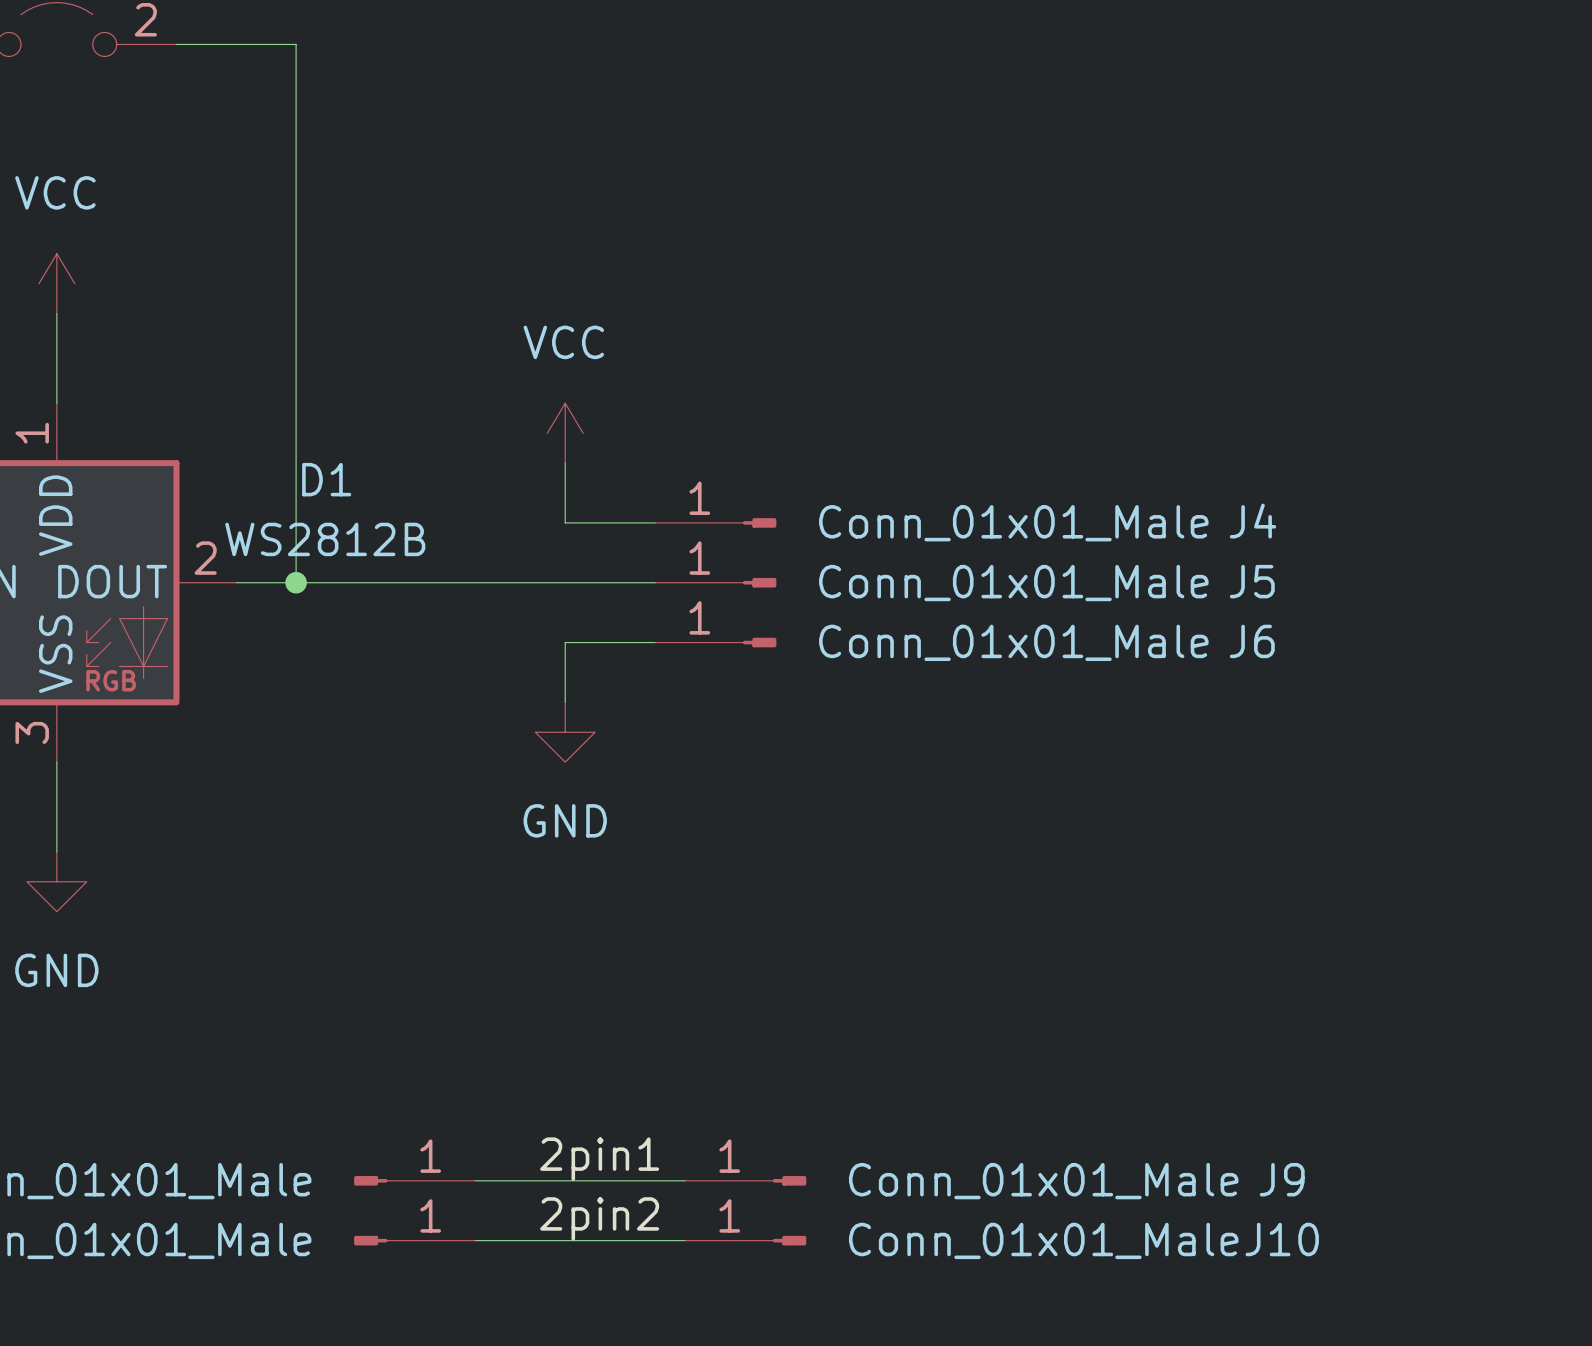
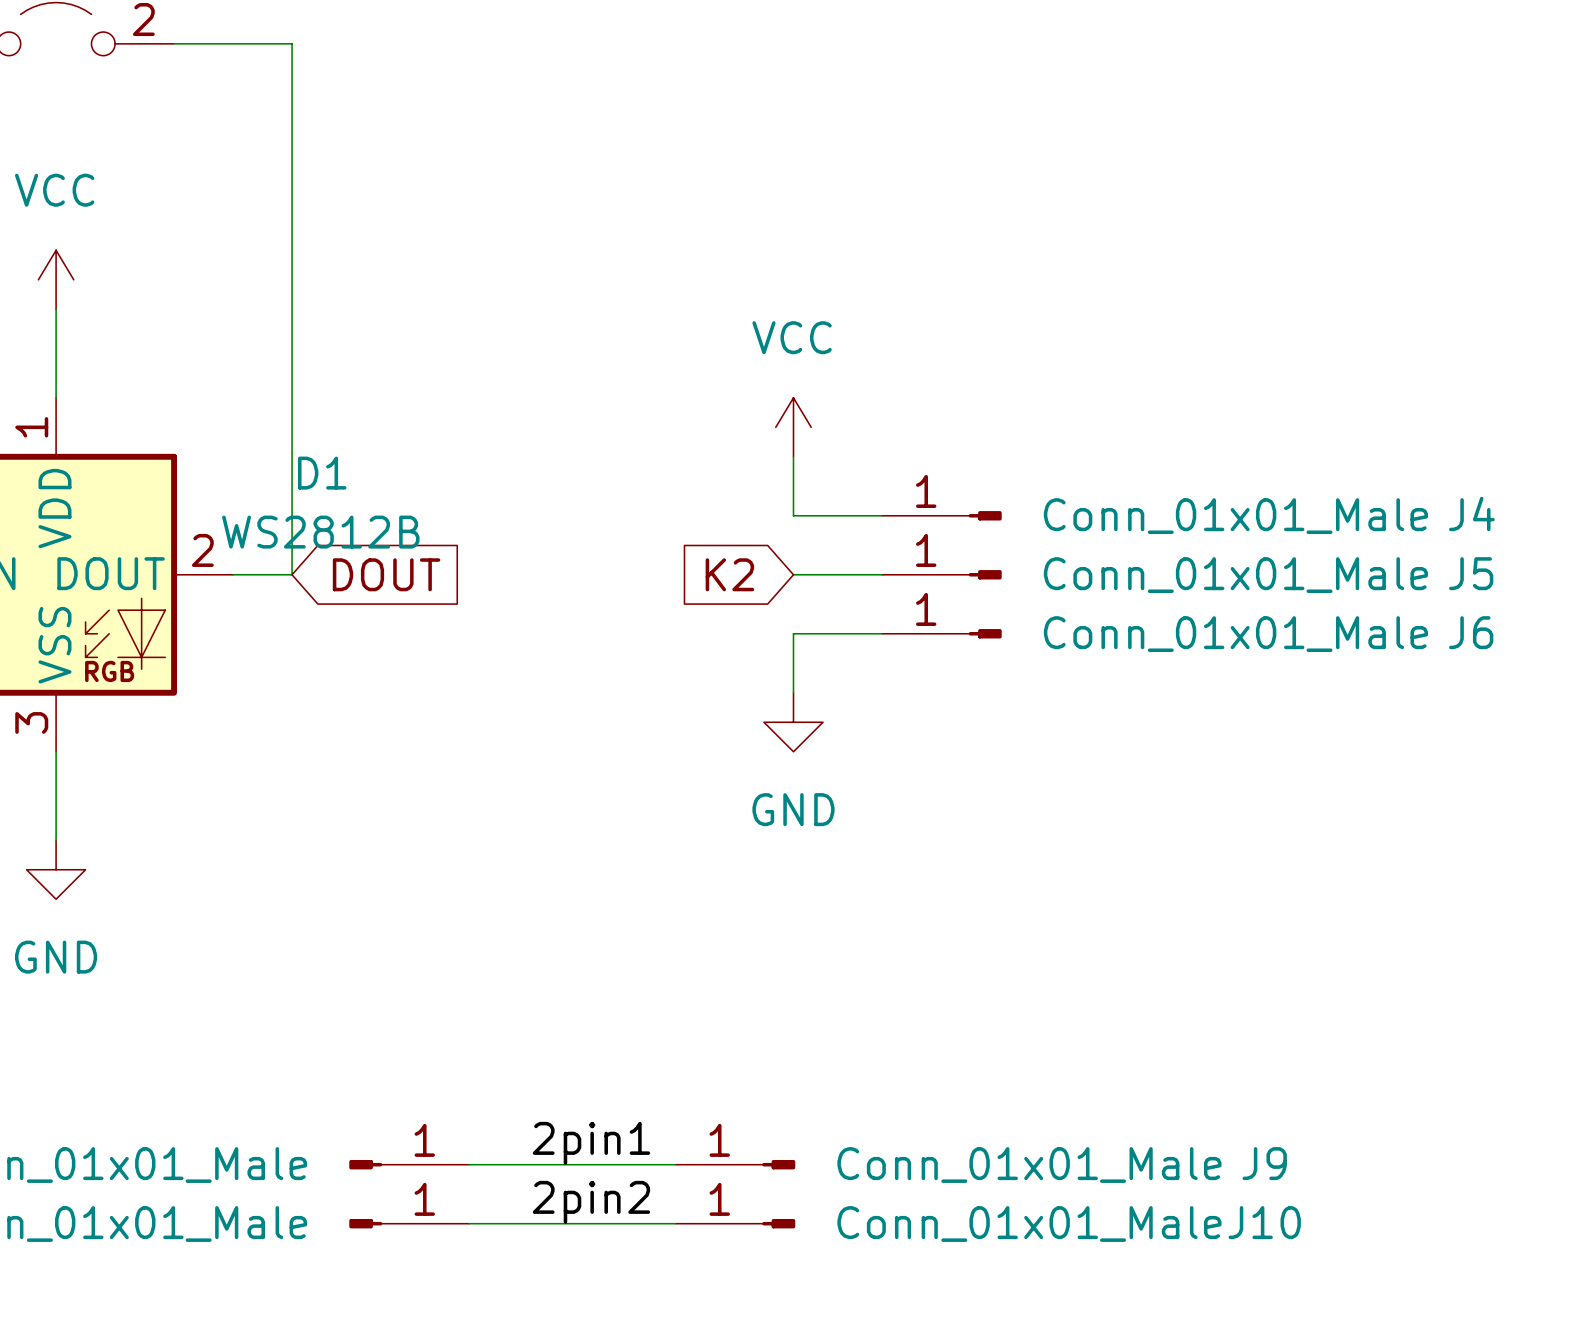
power symbol position: VCC (565, 433) -> VCC (793, 427)
wire: (565, 463) (565, 522) (654, 522) -> (793, 456) (793, 515) (881, 515)
J4 position: (715, 522) -> (941, 515)
wire: (296, 582) (654, 582) -> none
junction: (296, 582) -> none
global label: none -> DOUT (386, 574)
J5 position: (715, 582) -> (941, 574)
global label: none -> K2 (729, 574)
wire: none -> (793, 574) (881, 574)
wire: (654, 642) (565, 642) (565, 702) -> (881, 633) (793, 633) (793, 692)
J6 position: (715, 642) -> (941, 633)
power symbol position: GND (565, 732) -> GND (793, 722)

